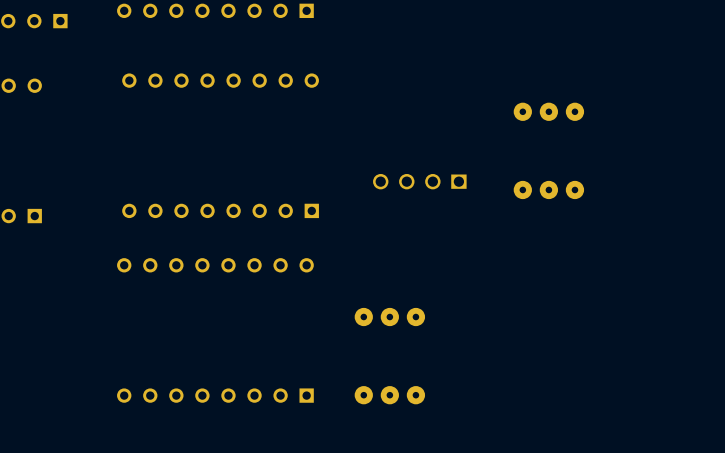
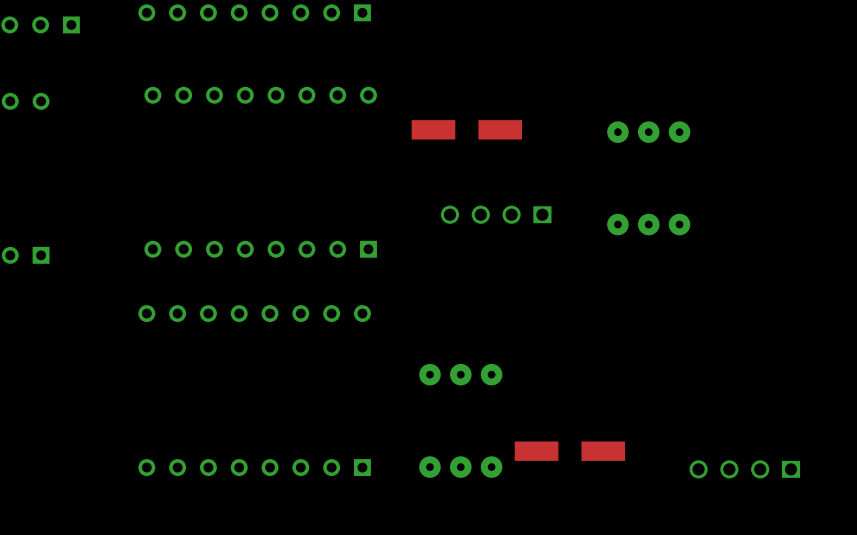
part: none -> (466, 129)
part: none -> (569, 451)
part: none -> (744, 469)

